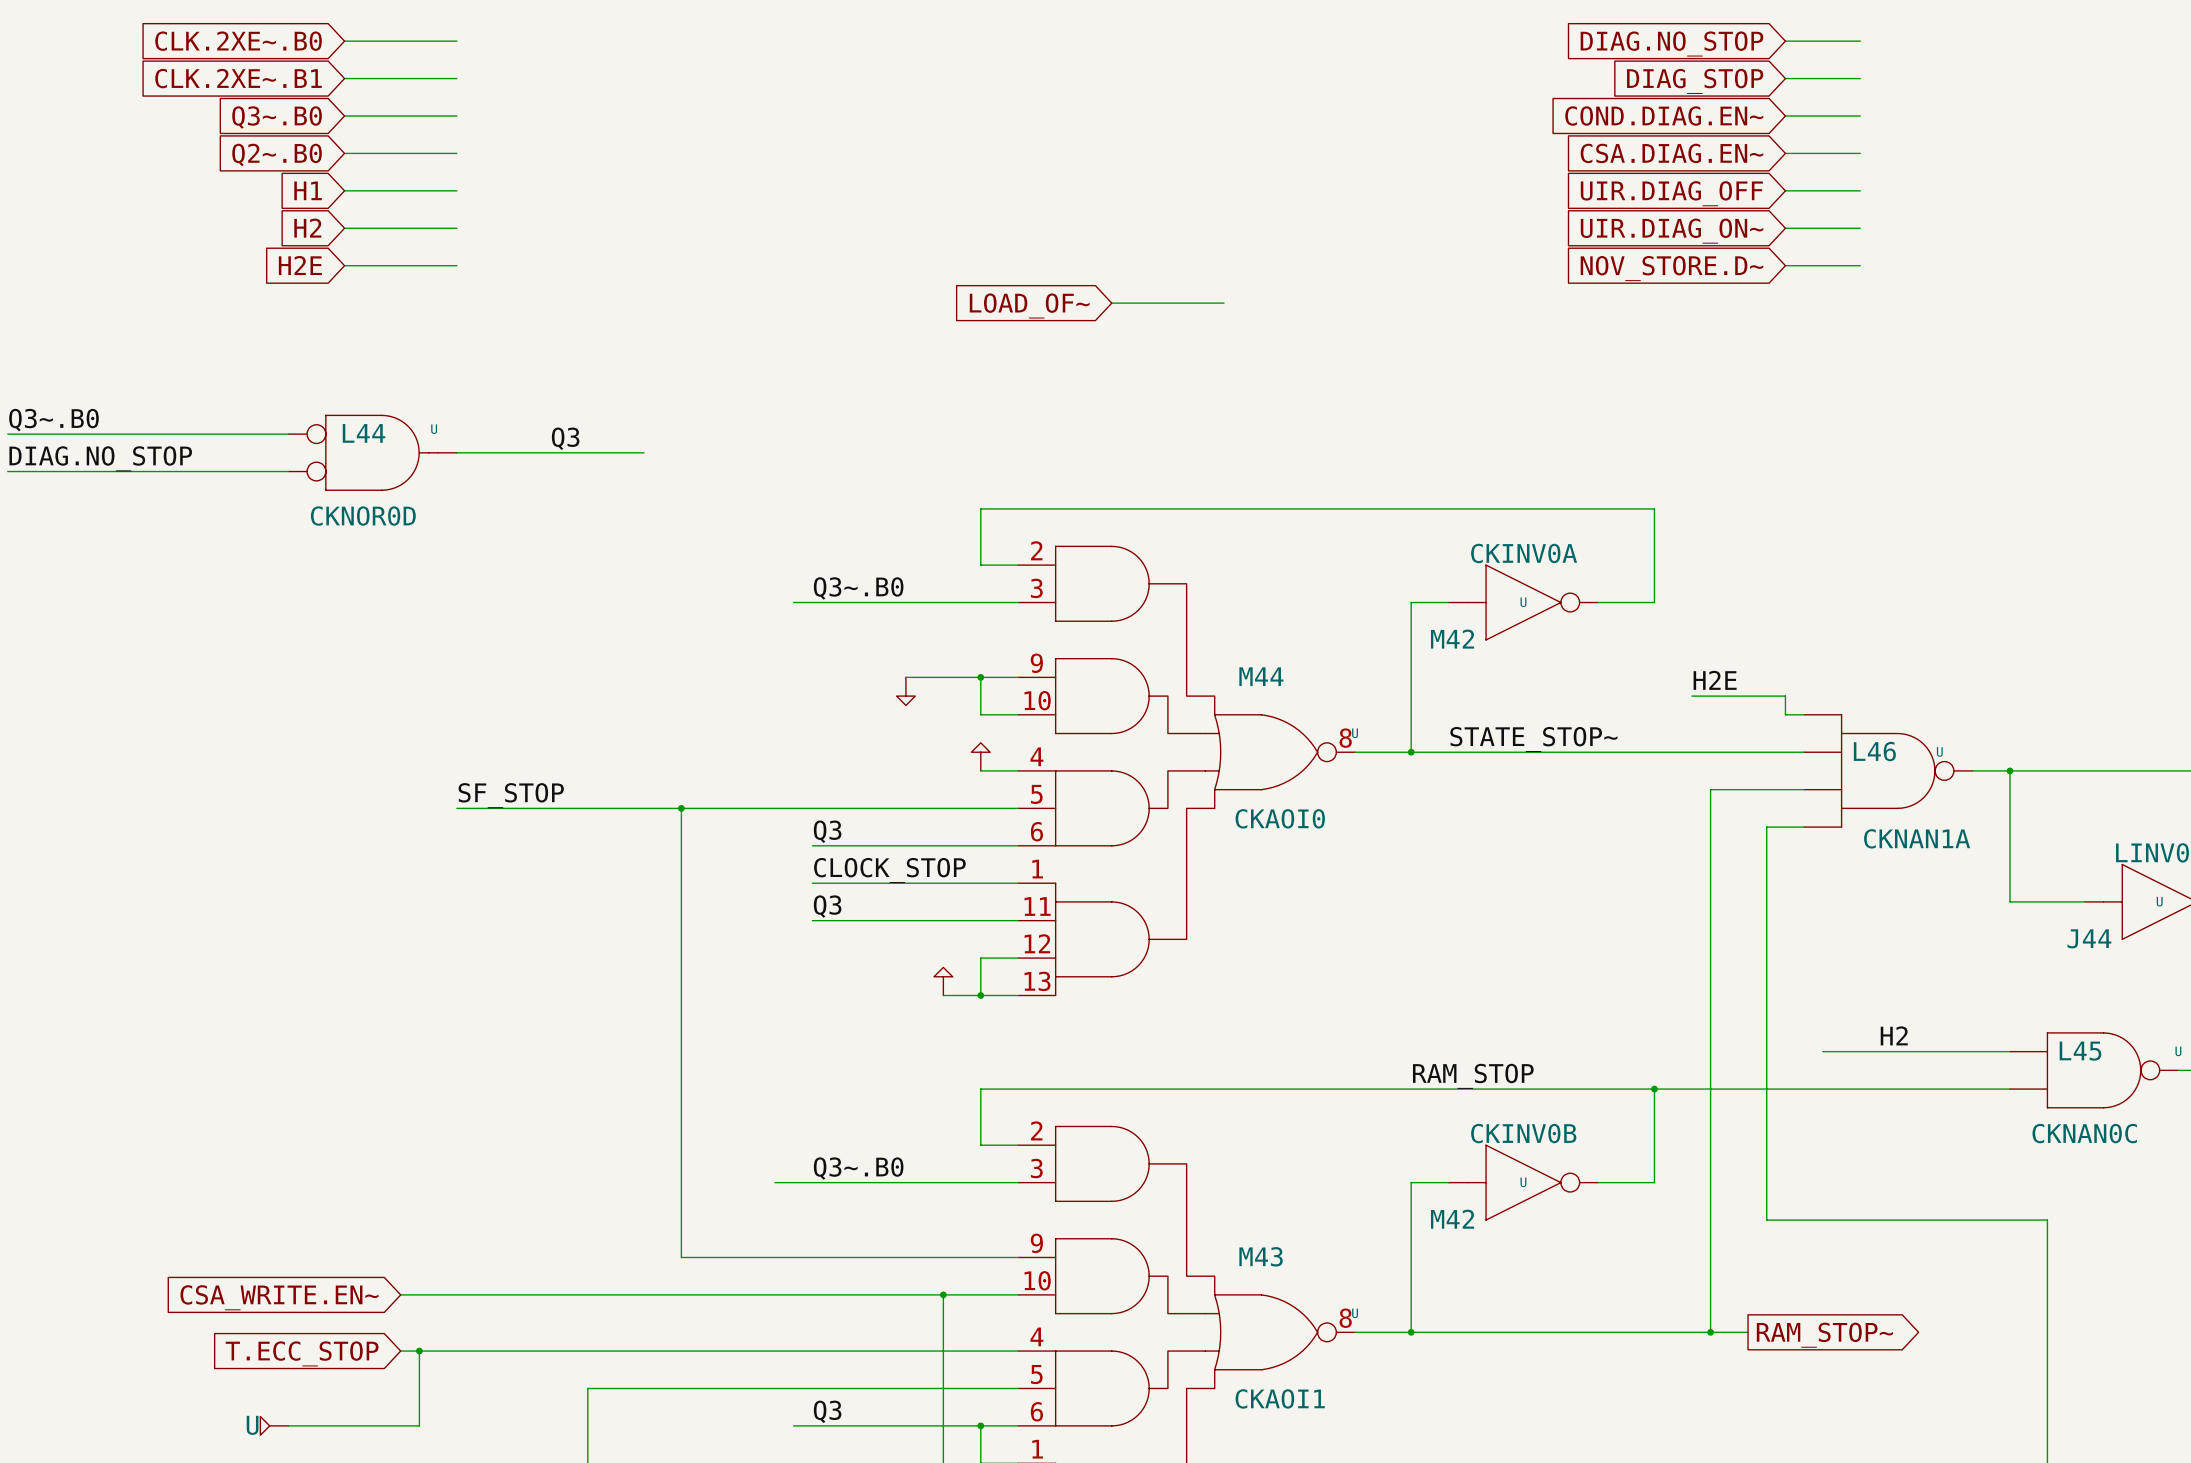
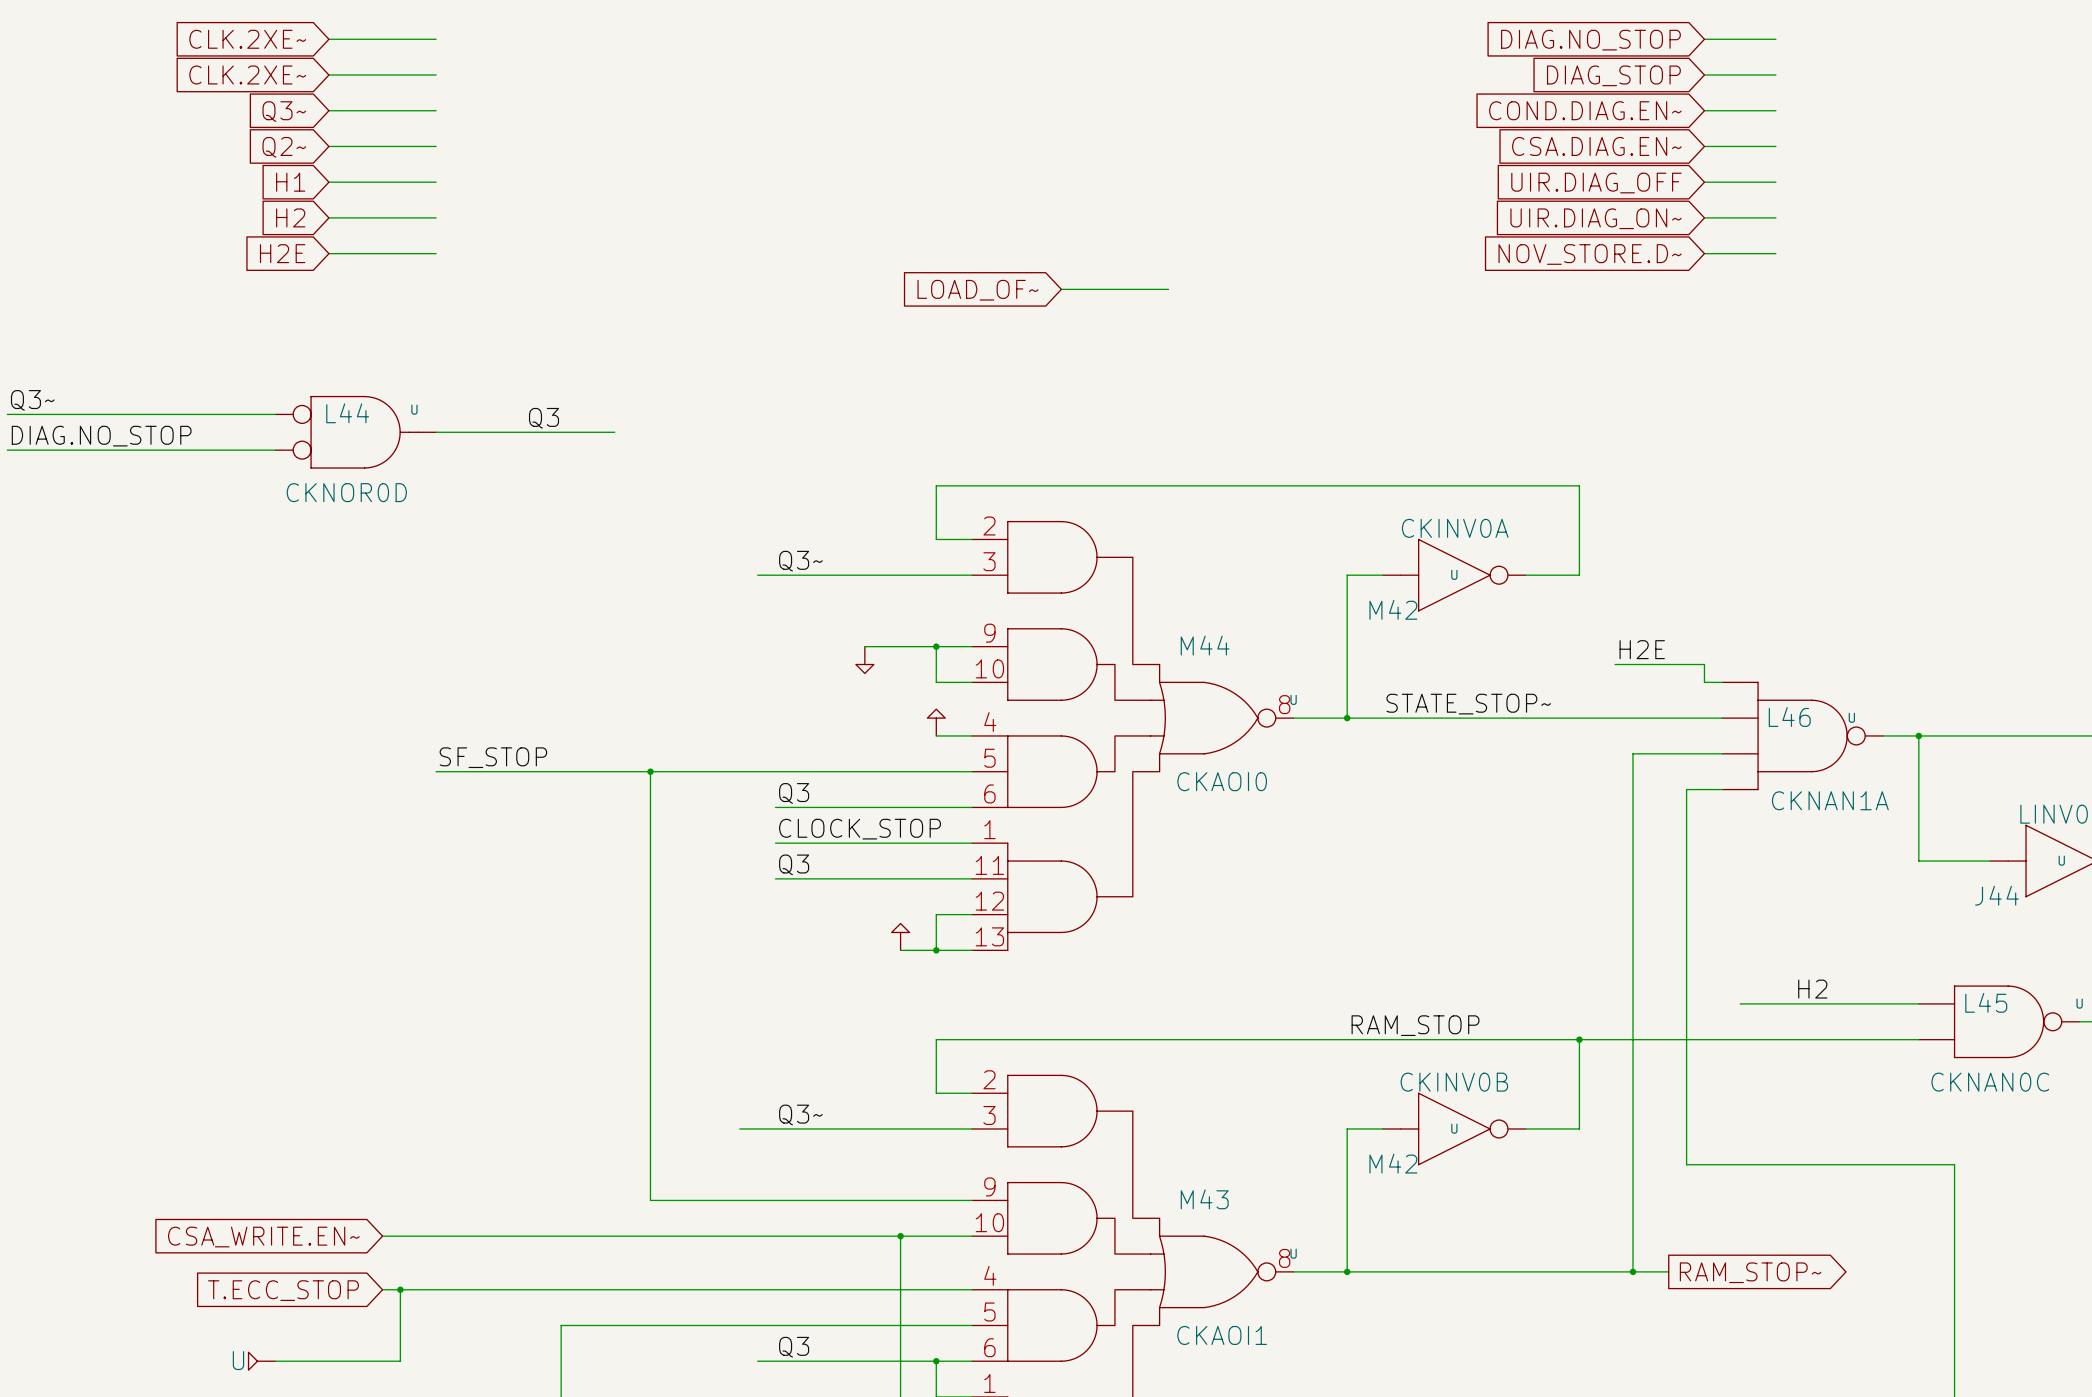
global label: CLK.2XE~.B0 (238, 41) -> CLK.2XE~ (247, 39)
global label: CLK.2XE~.B1 (238, 78) -> CLK.2XE~ (247, 75)
global label: Q3~.B0 (277, 117) -> Q3~ (284, 111)
global label: Q2~.B0 (277, 154) -> Q2~ (284, 147)
label: Q3~.B0 (53, 420) -> Q3~ (32, 400)
label: Q3~.B0 (858, 588) -> Q3~ (800, 561)
label: Q3~.B0 (858, 1168) -> Q3~ (800, 1114)

